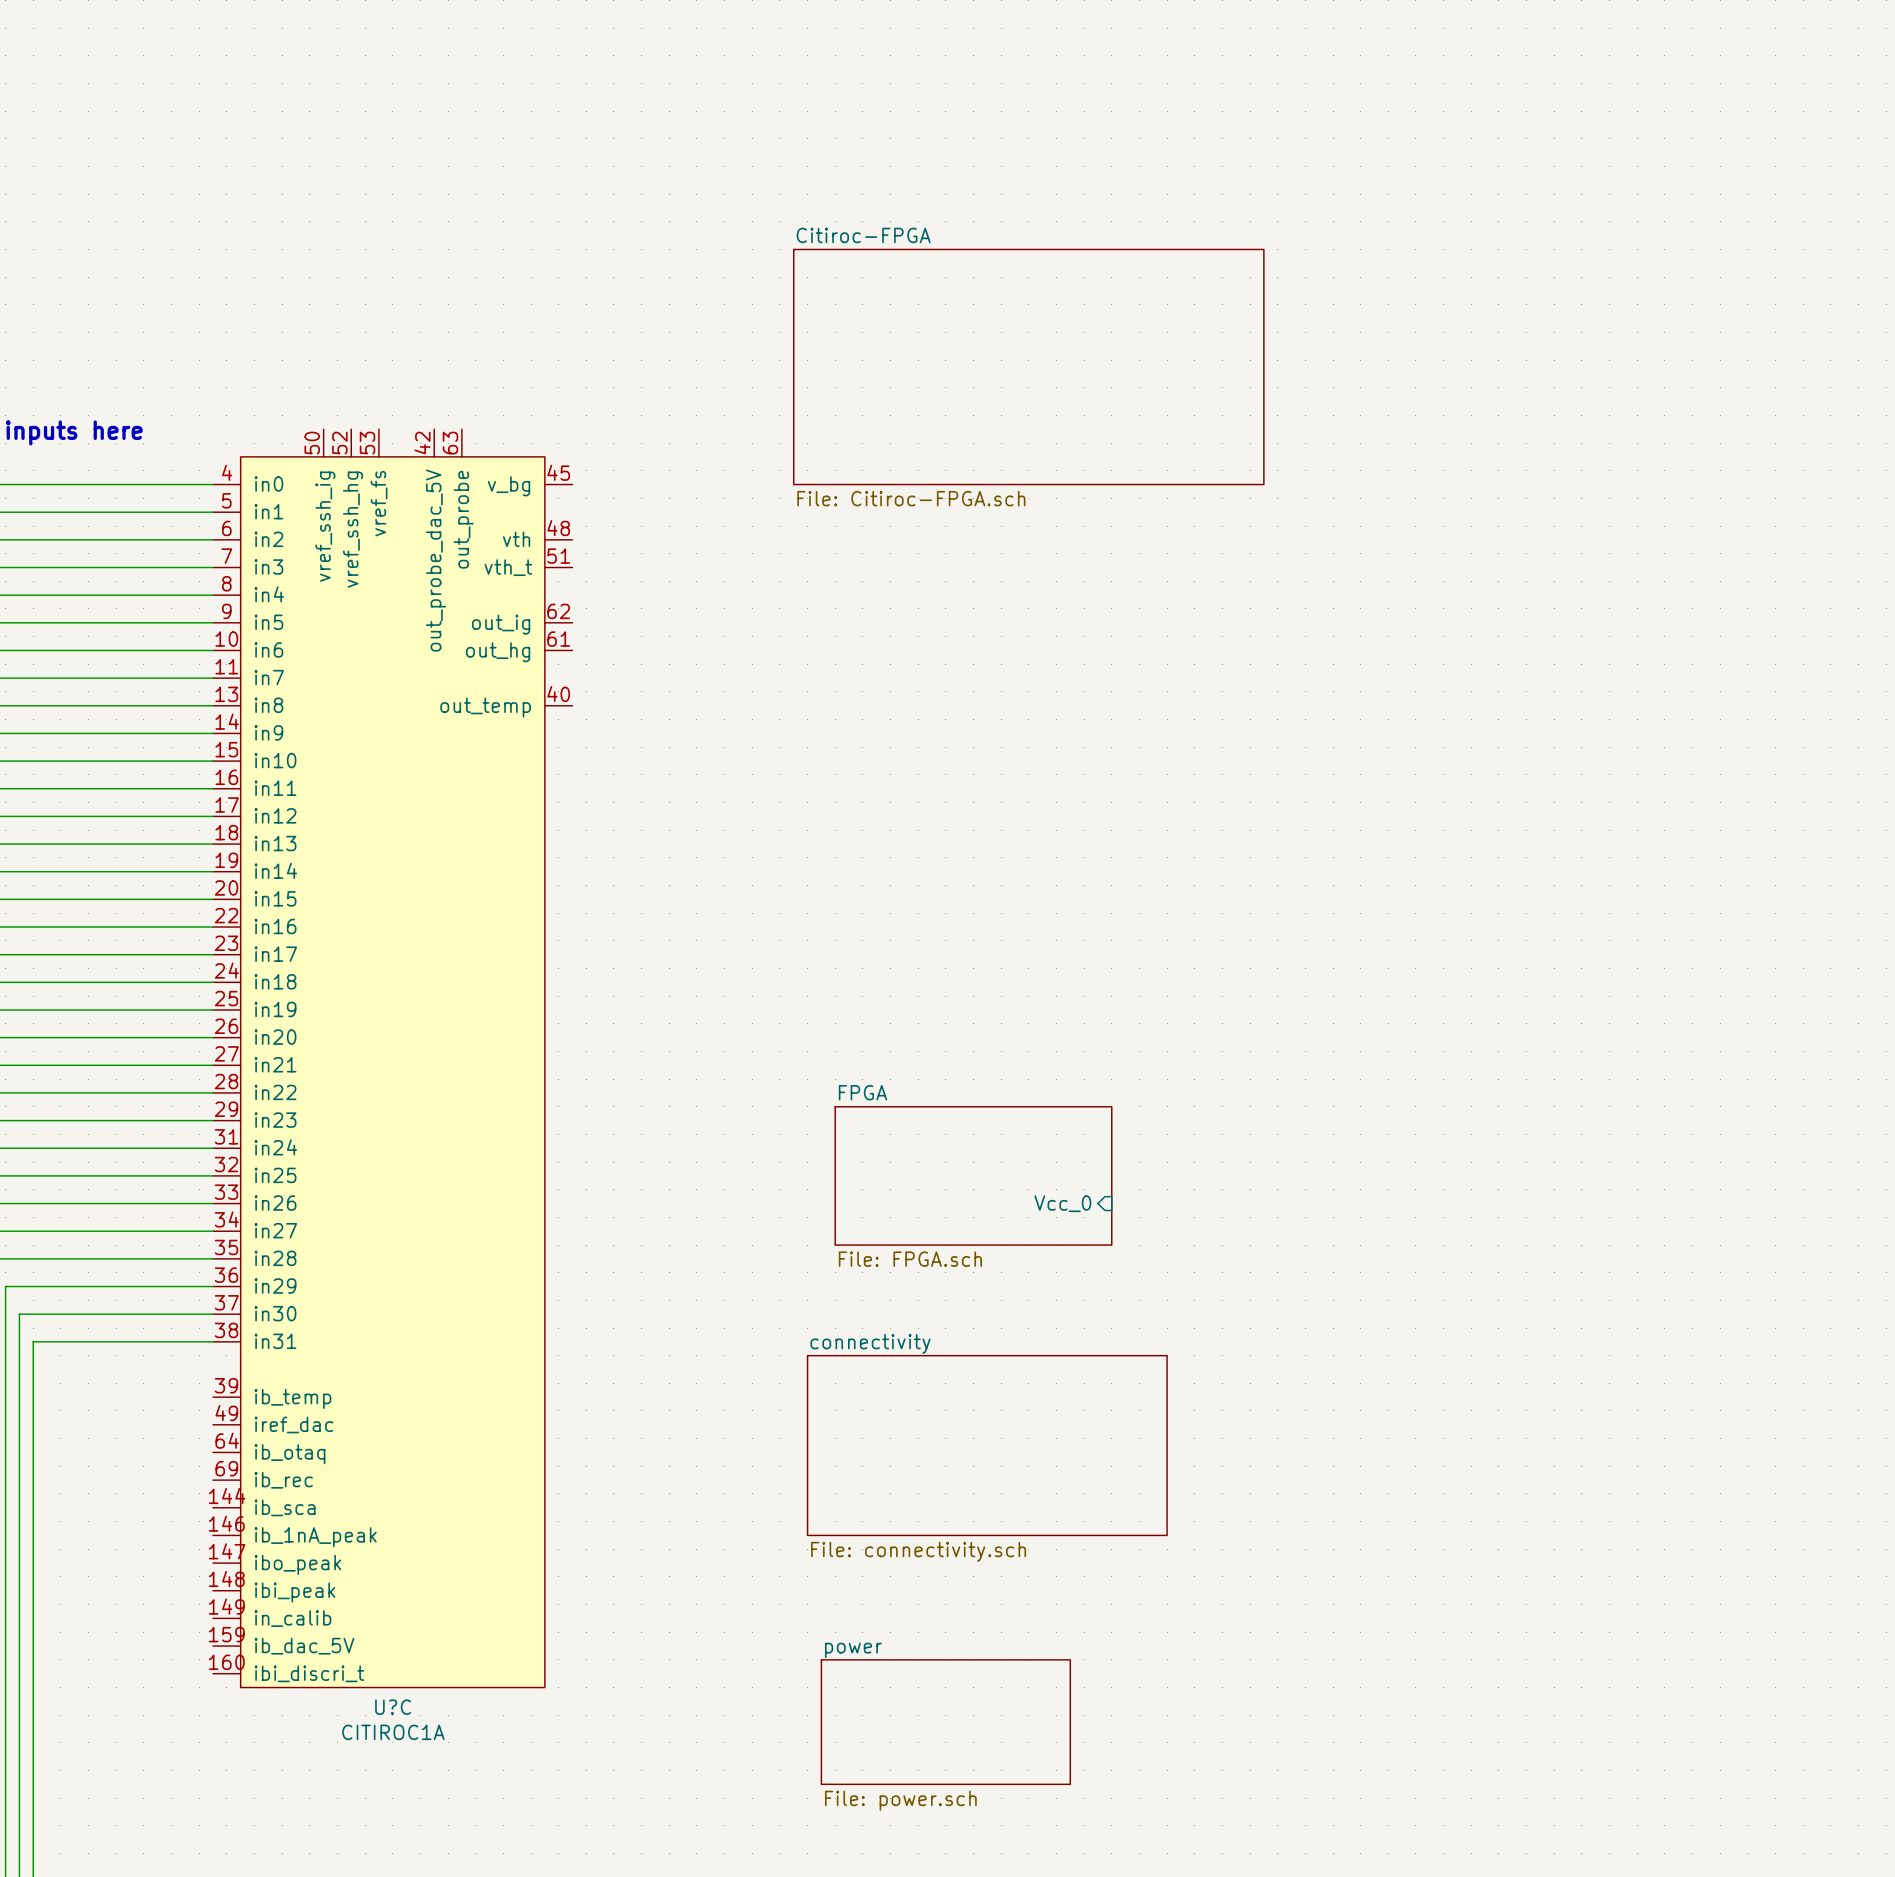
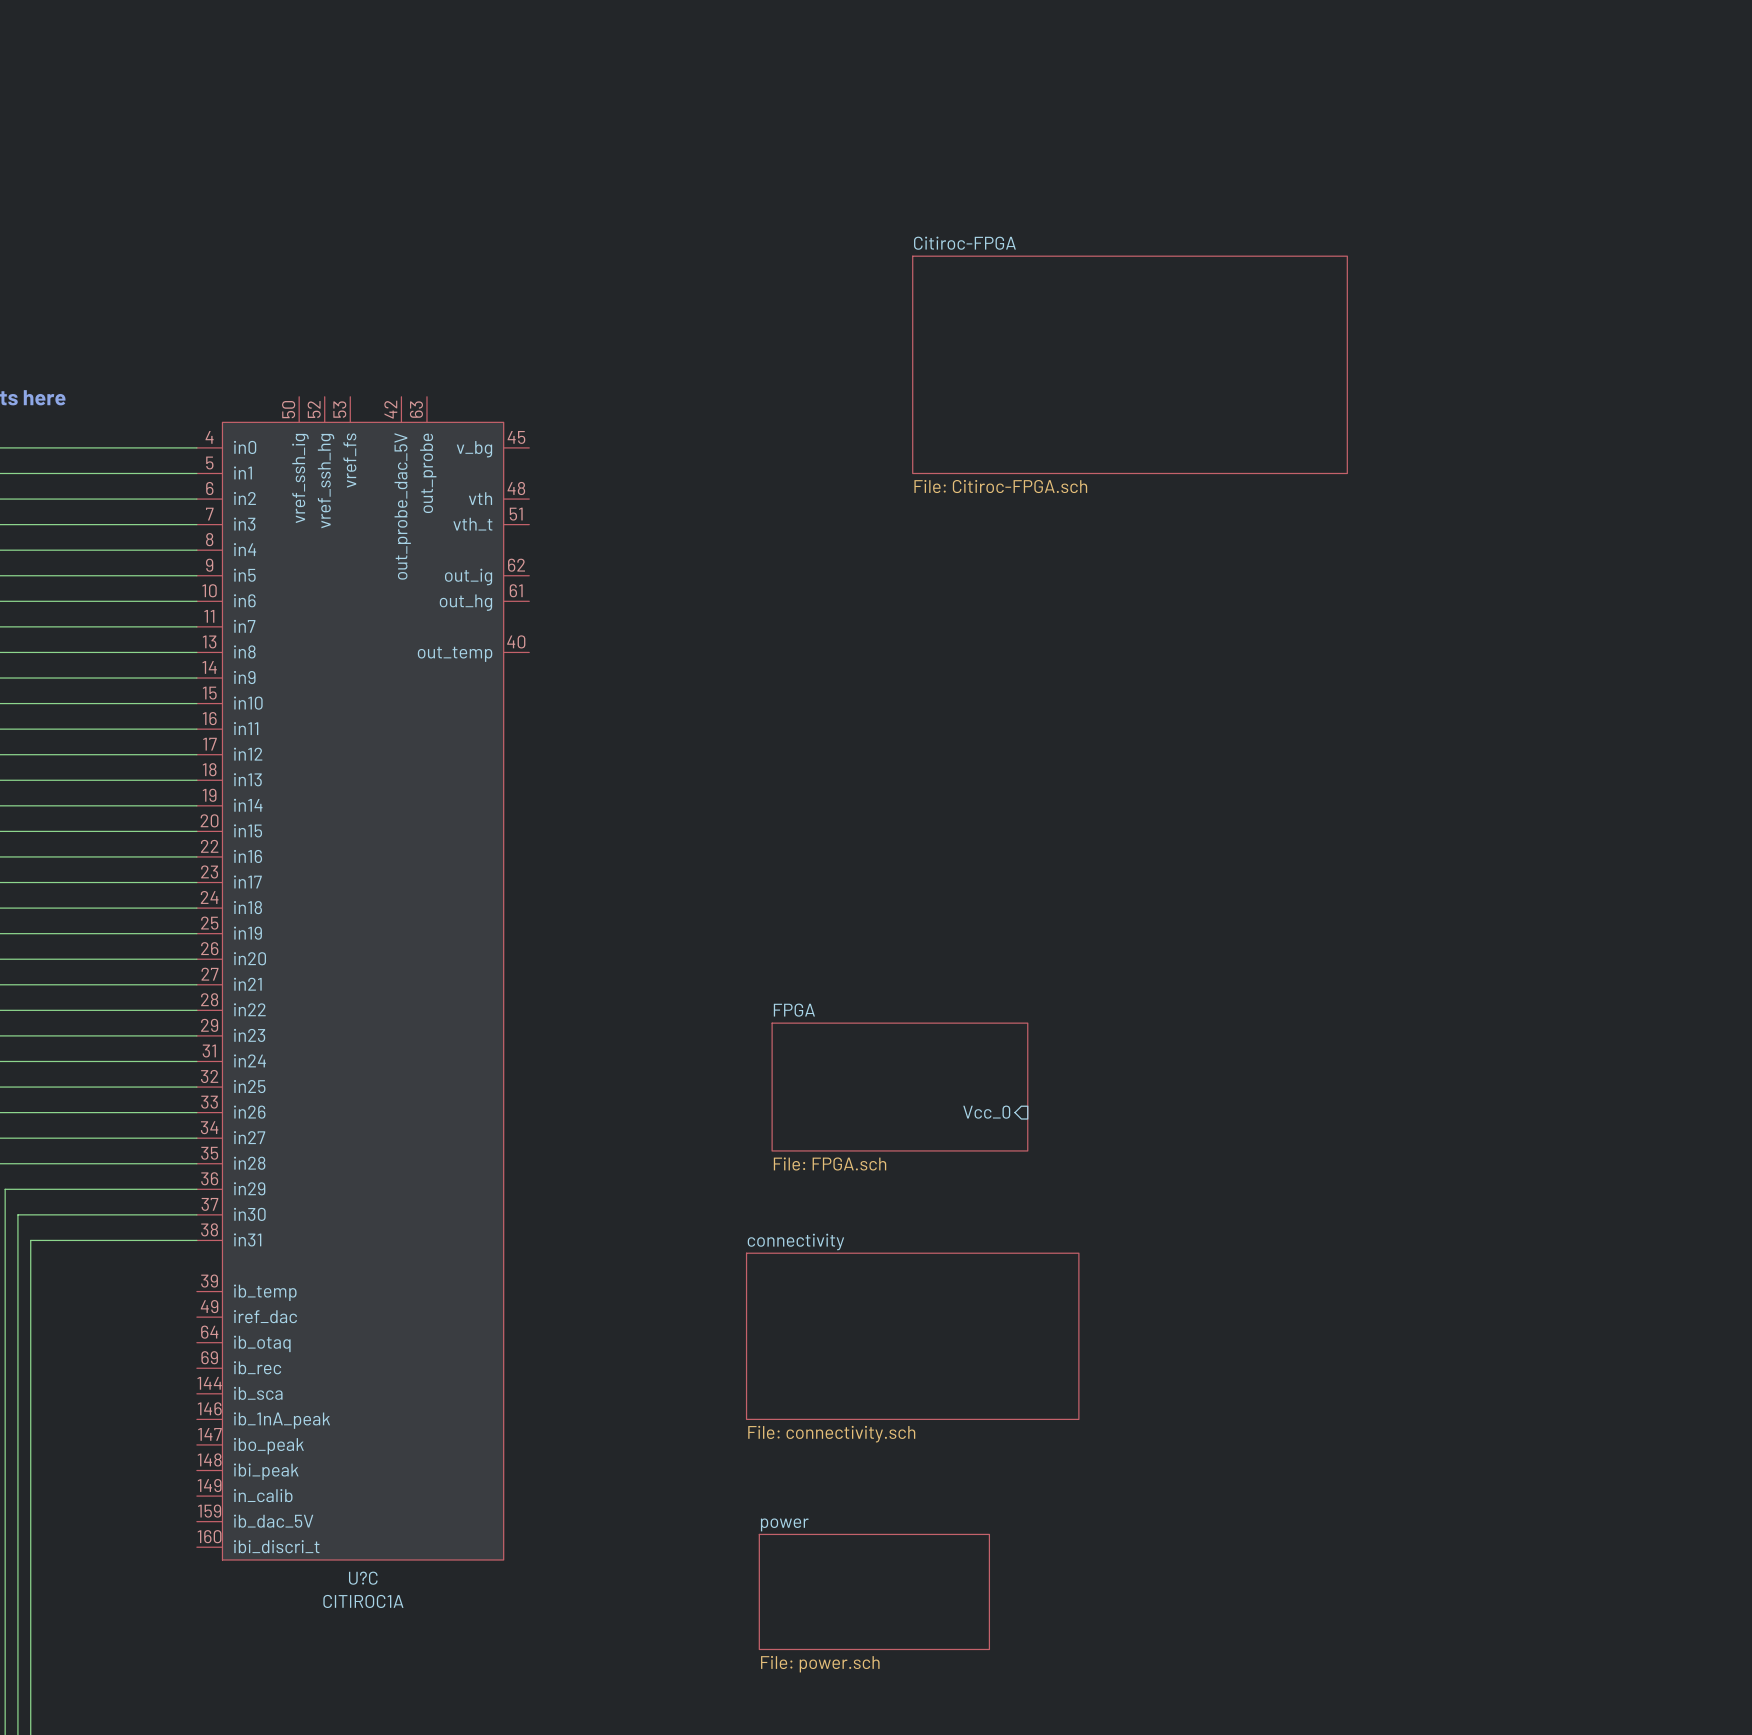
sheet Citiroc-FPGA position: (1028, 367) -> (1130, 364)

